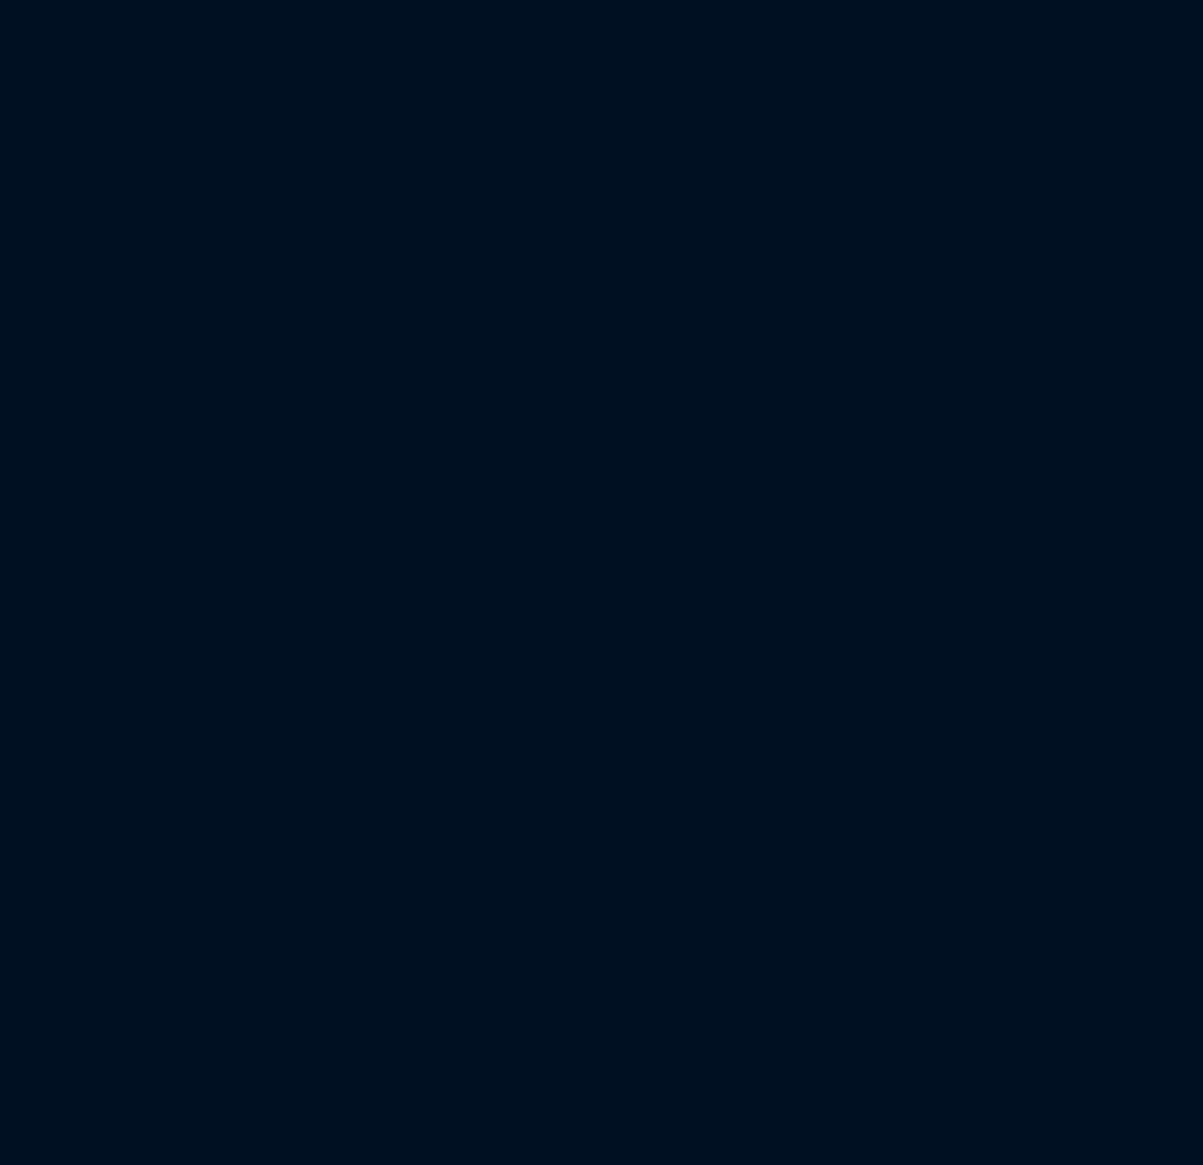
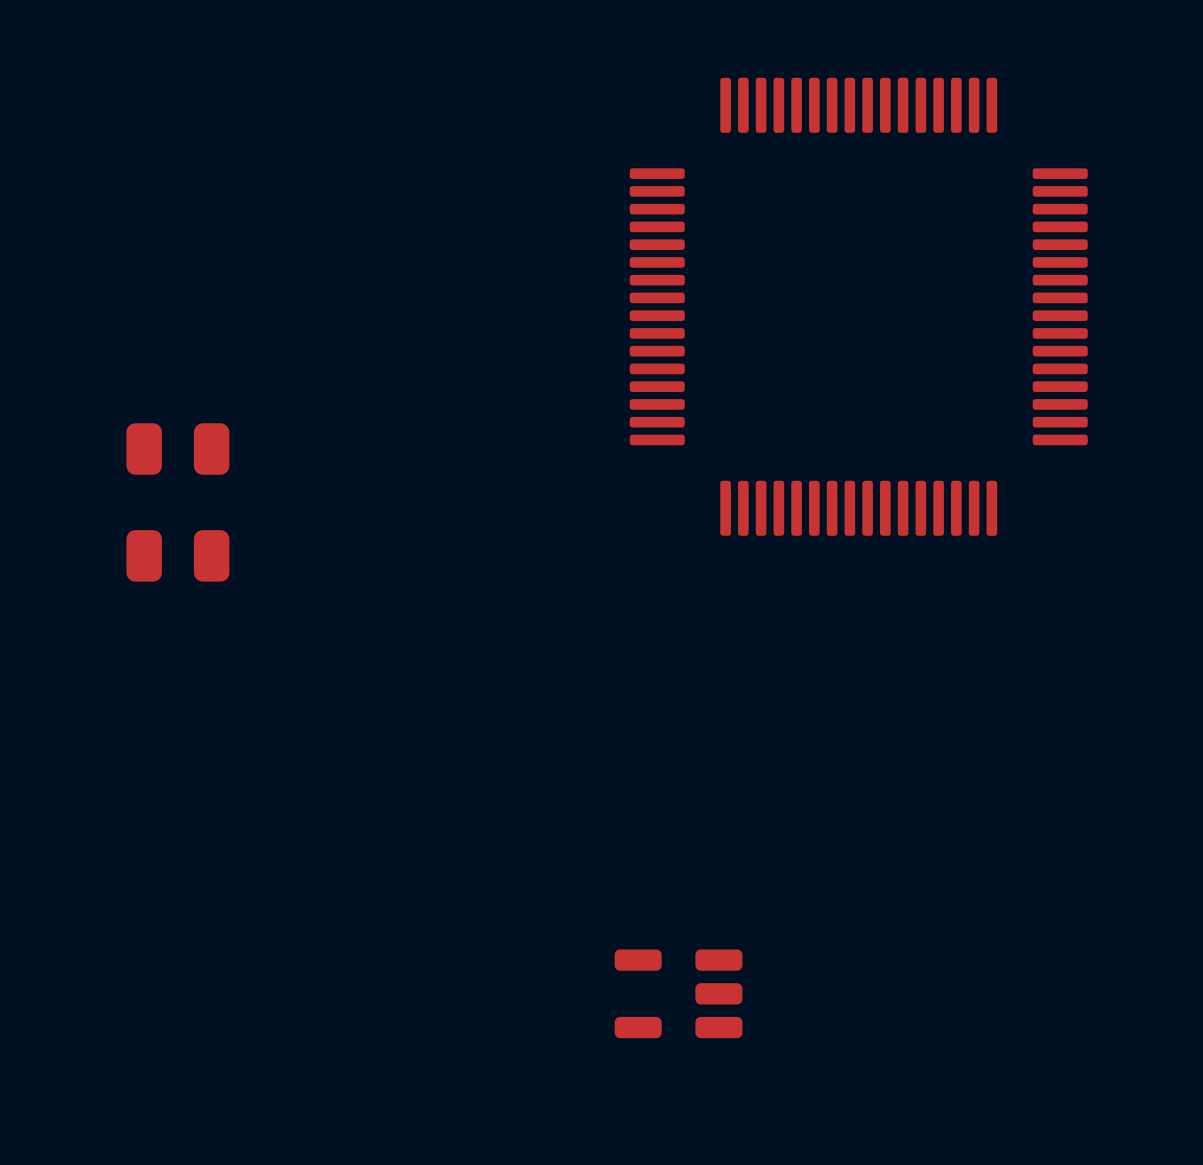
part: none -> (858, 306)
part: none -> (177, 448)
part: none -> (177, 555)
part: none -> (678, 993)

